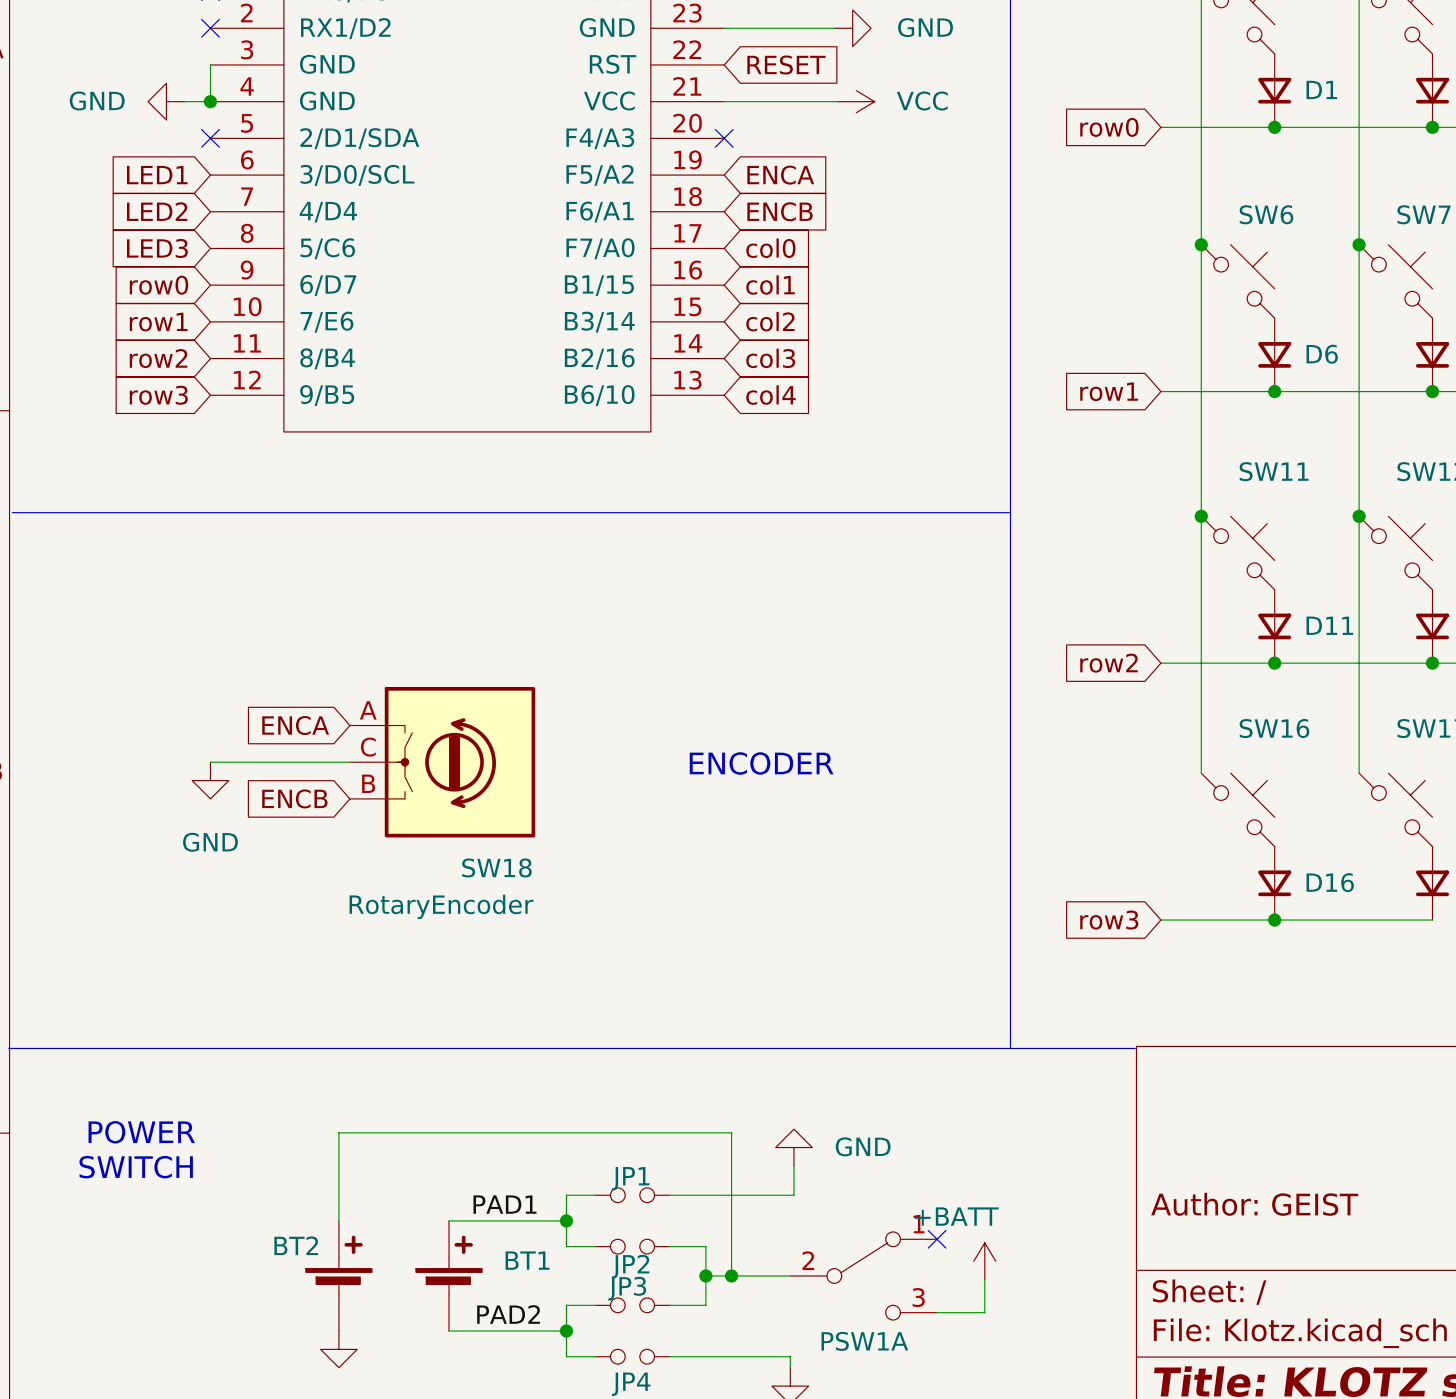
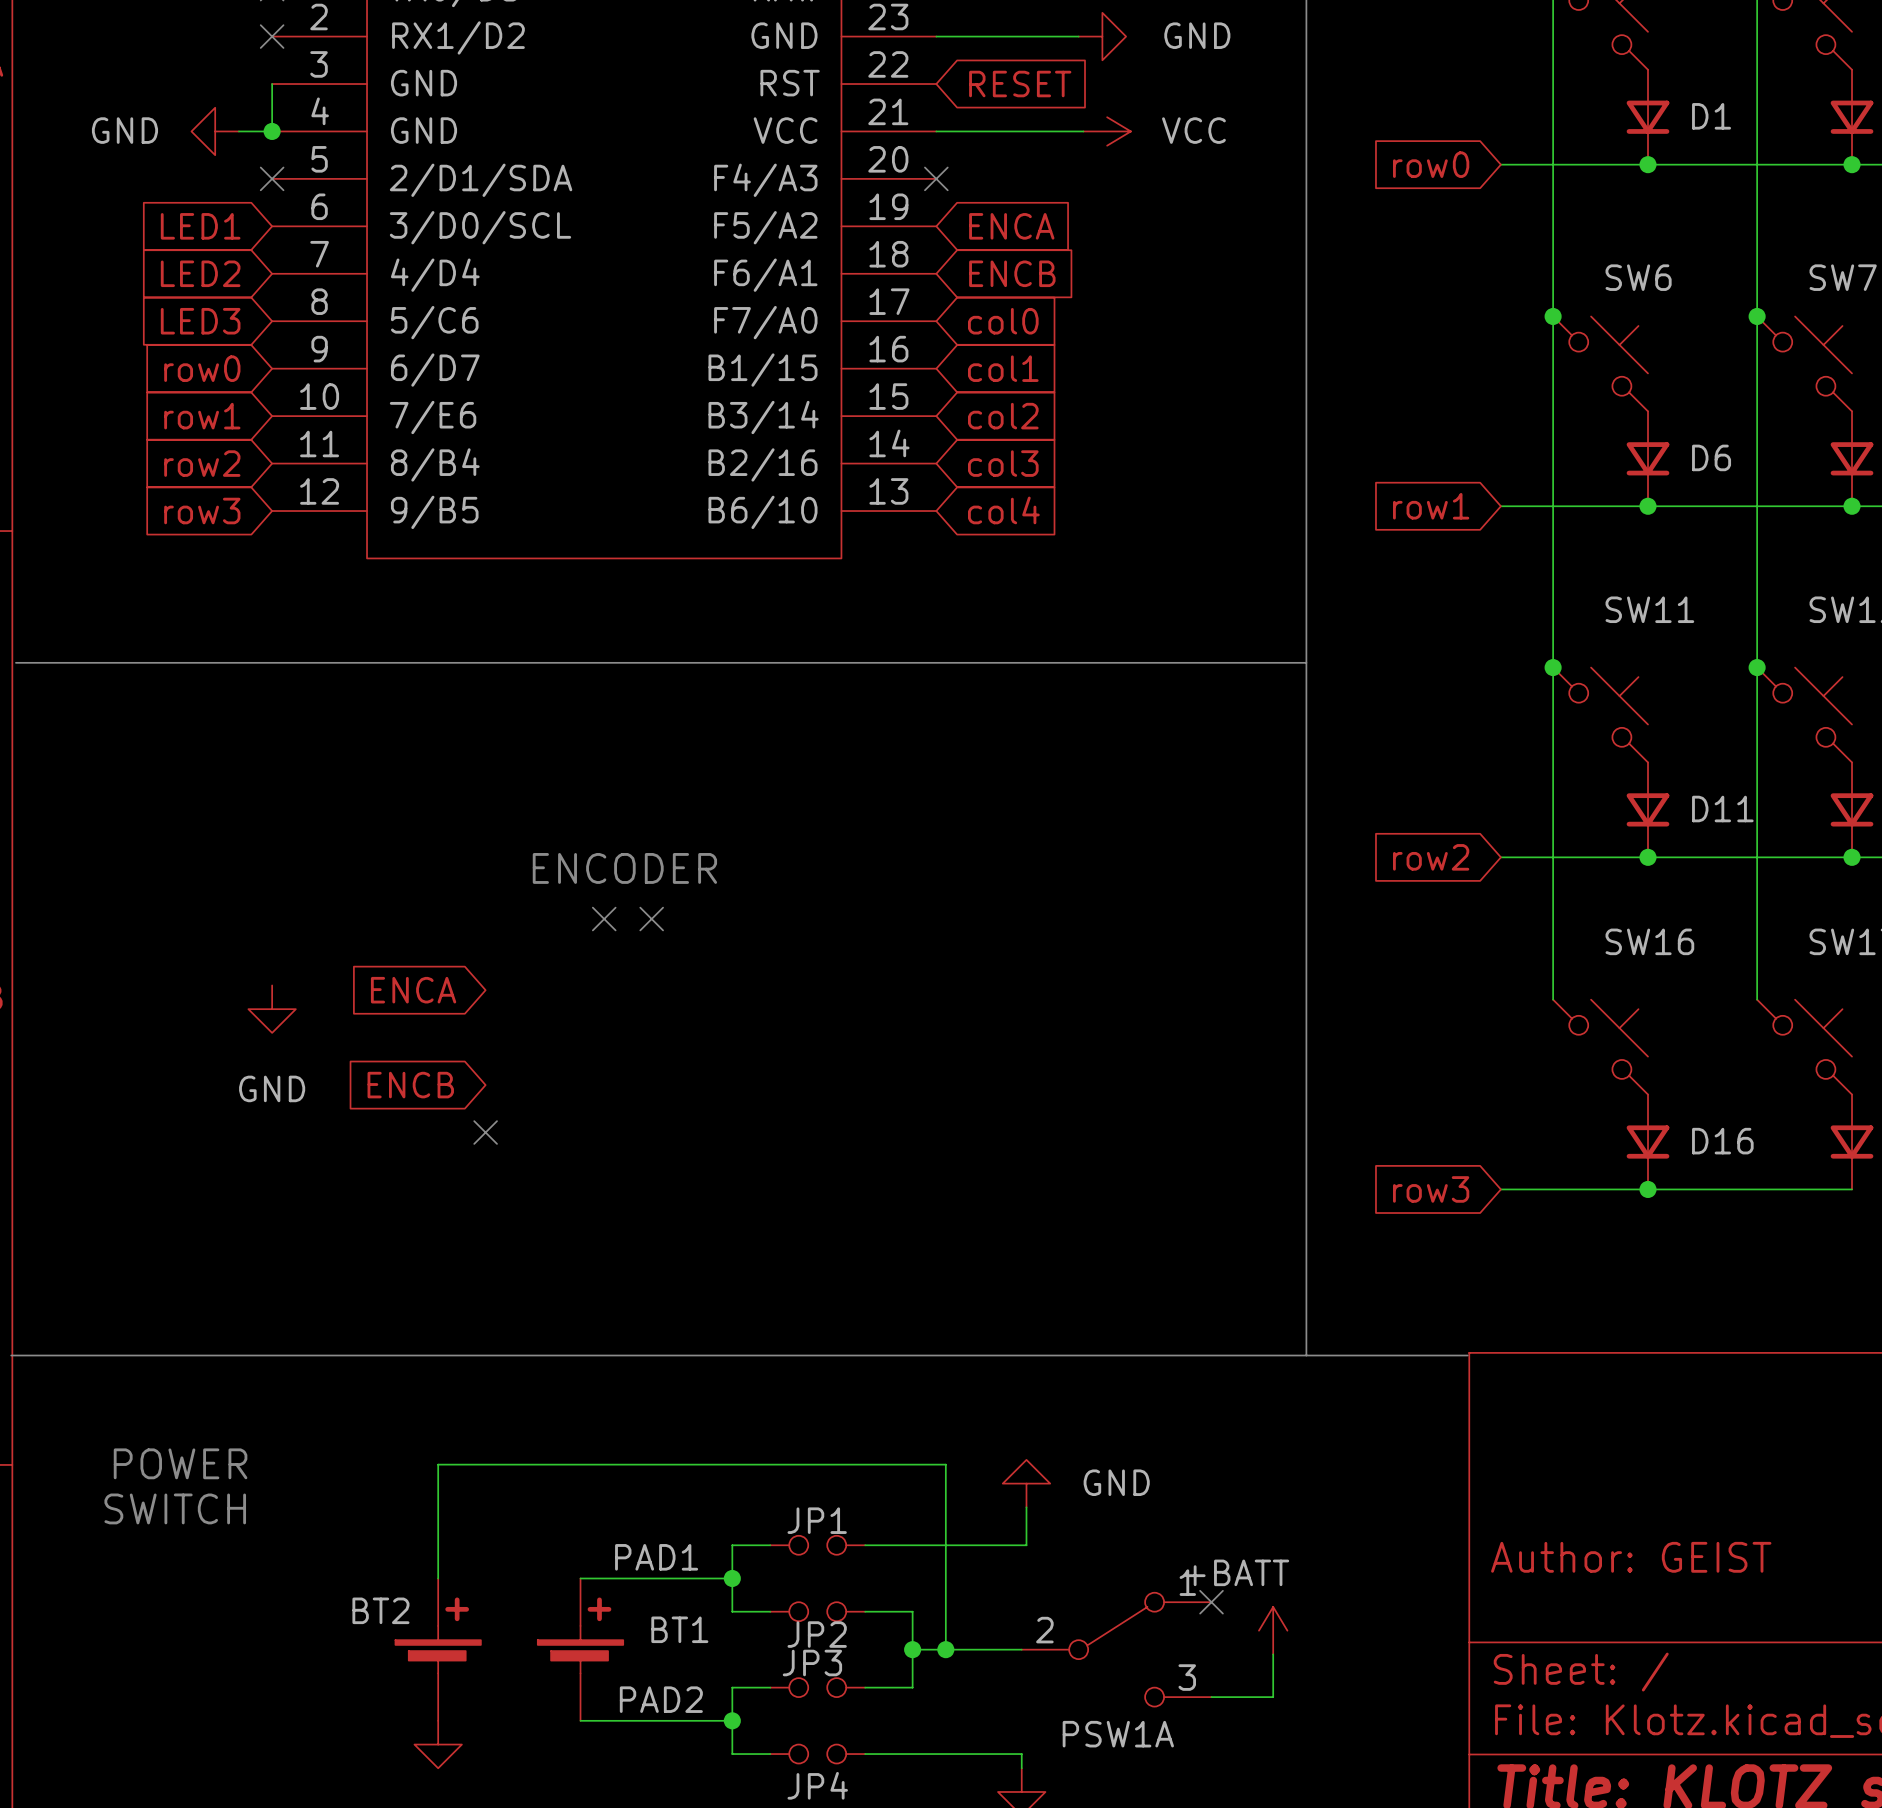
no-connect mark: none -> (604, 919)
no-connect mark: none -> (651, 919)
global label position: ENCA (295, 725) -> ENCA (413, 990)
wire: (210, 762) (349, 762) -> none
SW18: RotaryEncoder (442, 762) -> none
text position: ENCODER (761, 763) -> ENCODER (624, 868)
global label position: ENCB (294, 798) -> ENCB (410, 1085)
no-connect mark: none -> (485, 1132)

